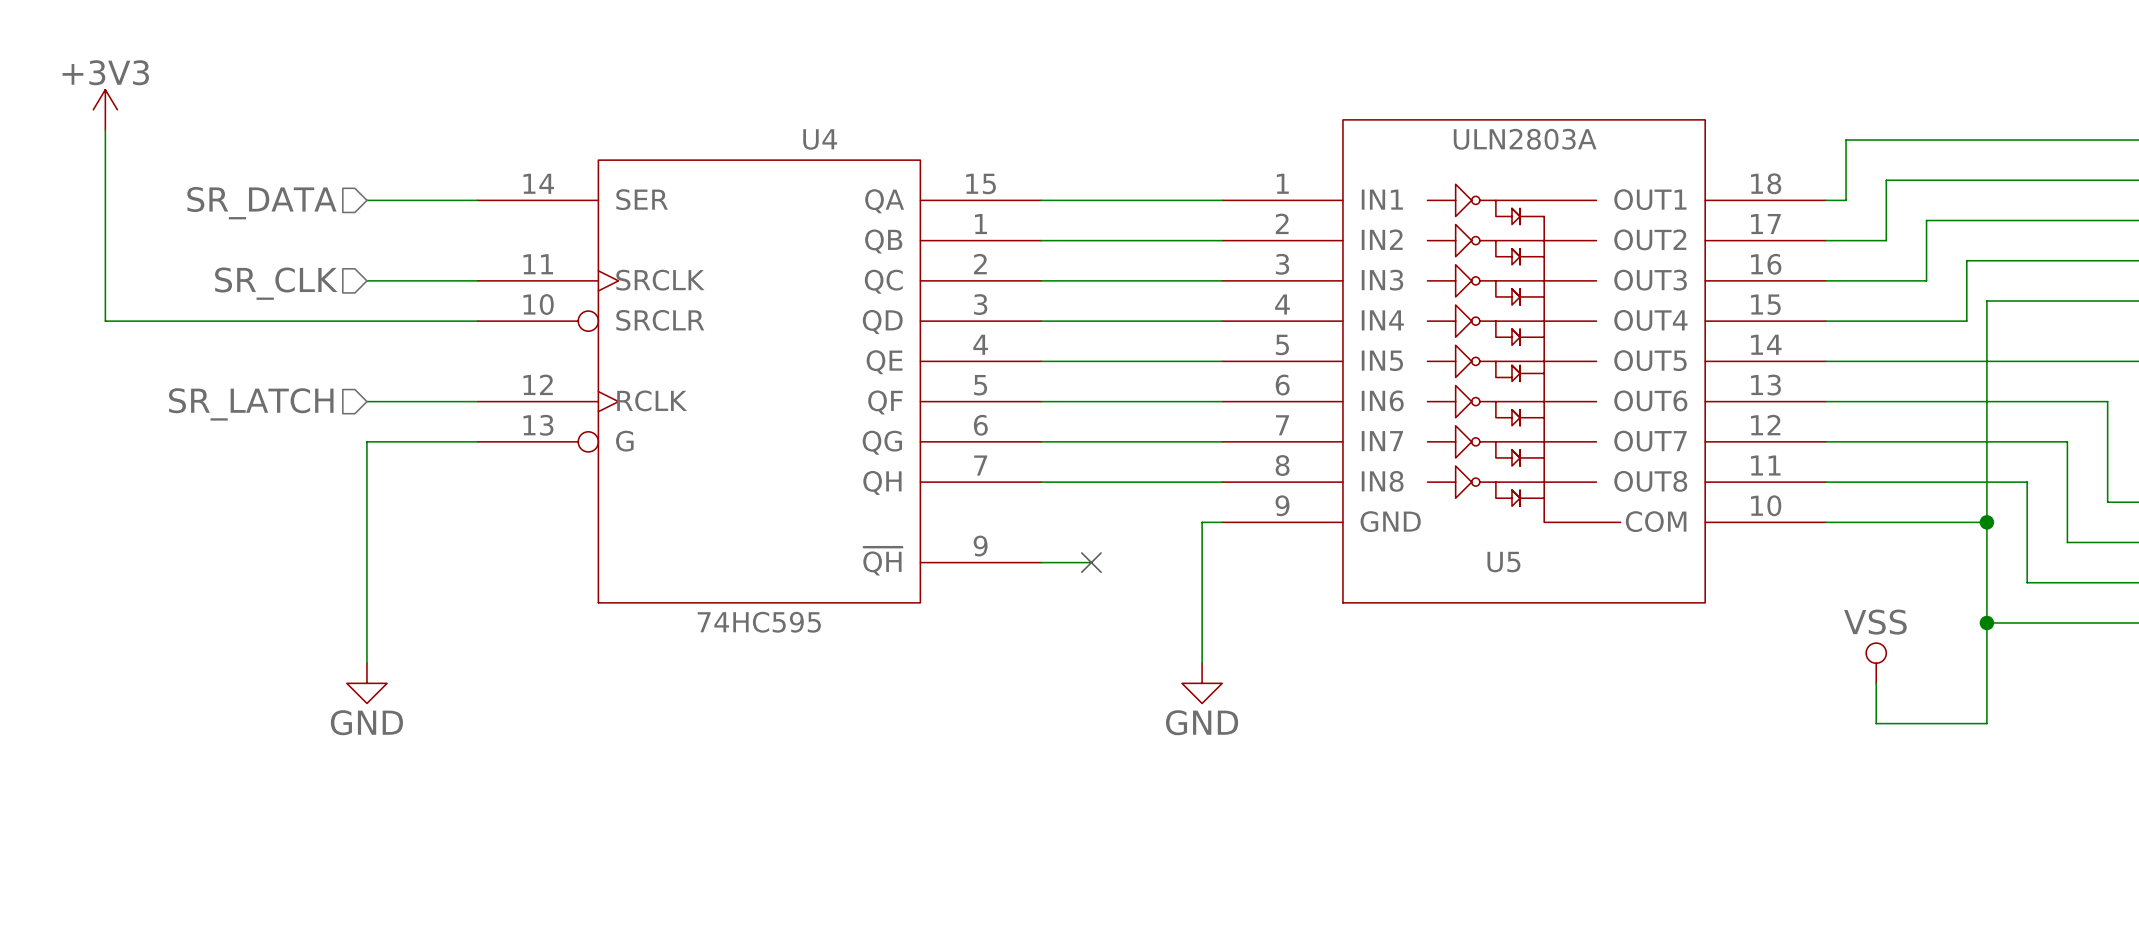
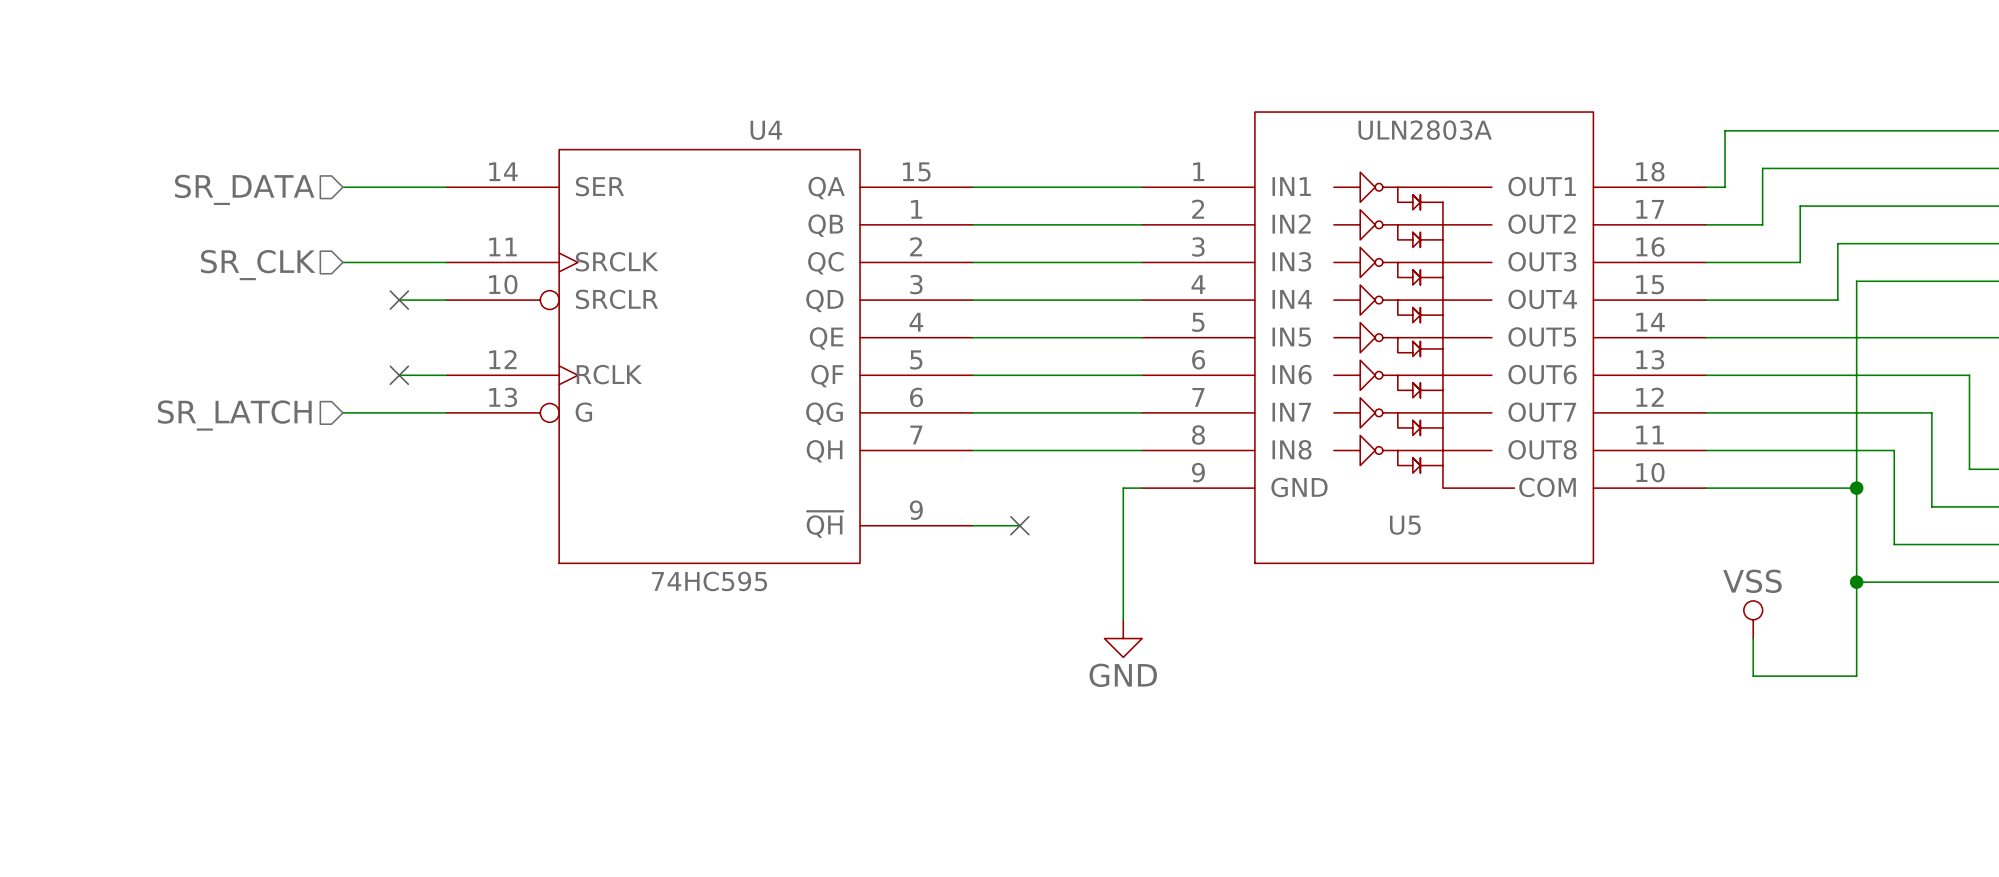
power symbol: +3V3 (105, 109) -> none
wire: (105, 129) (105, 321) (427, 321) -> none
no-connect mark: none -> (399, 300)
wire: (366, 401) (427, 401) -> none
no-connect mark: none -> (399, 375)
hierarchical label position: SR_LATCH (251, 404) -> SR_LATCH (234, 415)
wire: (366, 441) (366, 663) -> none
power symbol: GND (366, 683) -> none

